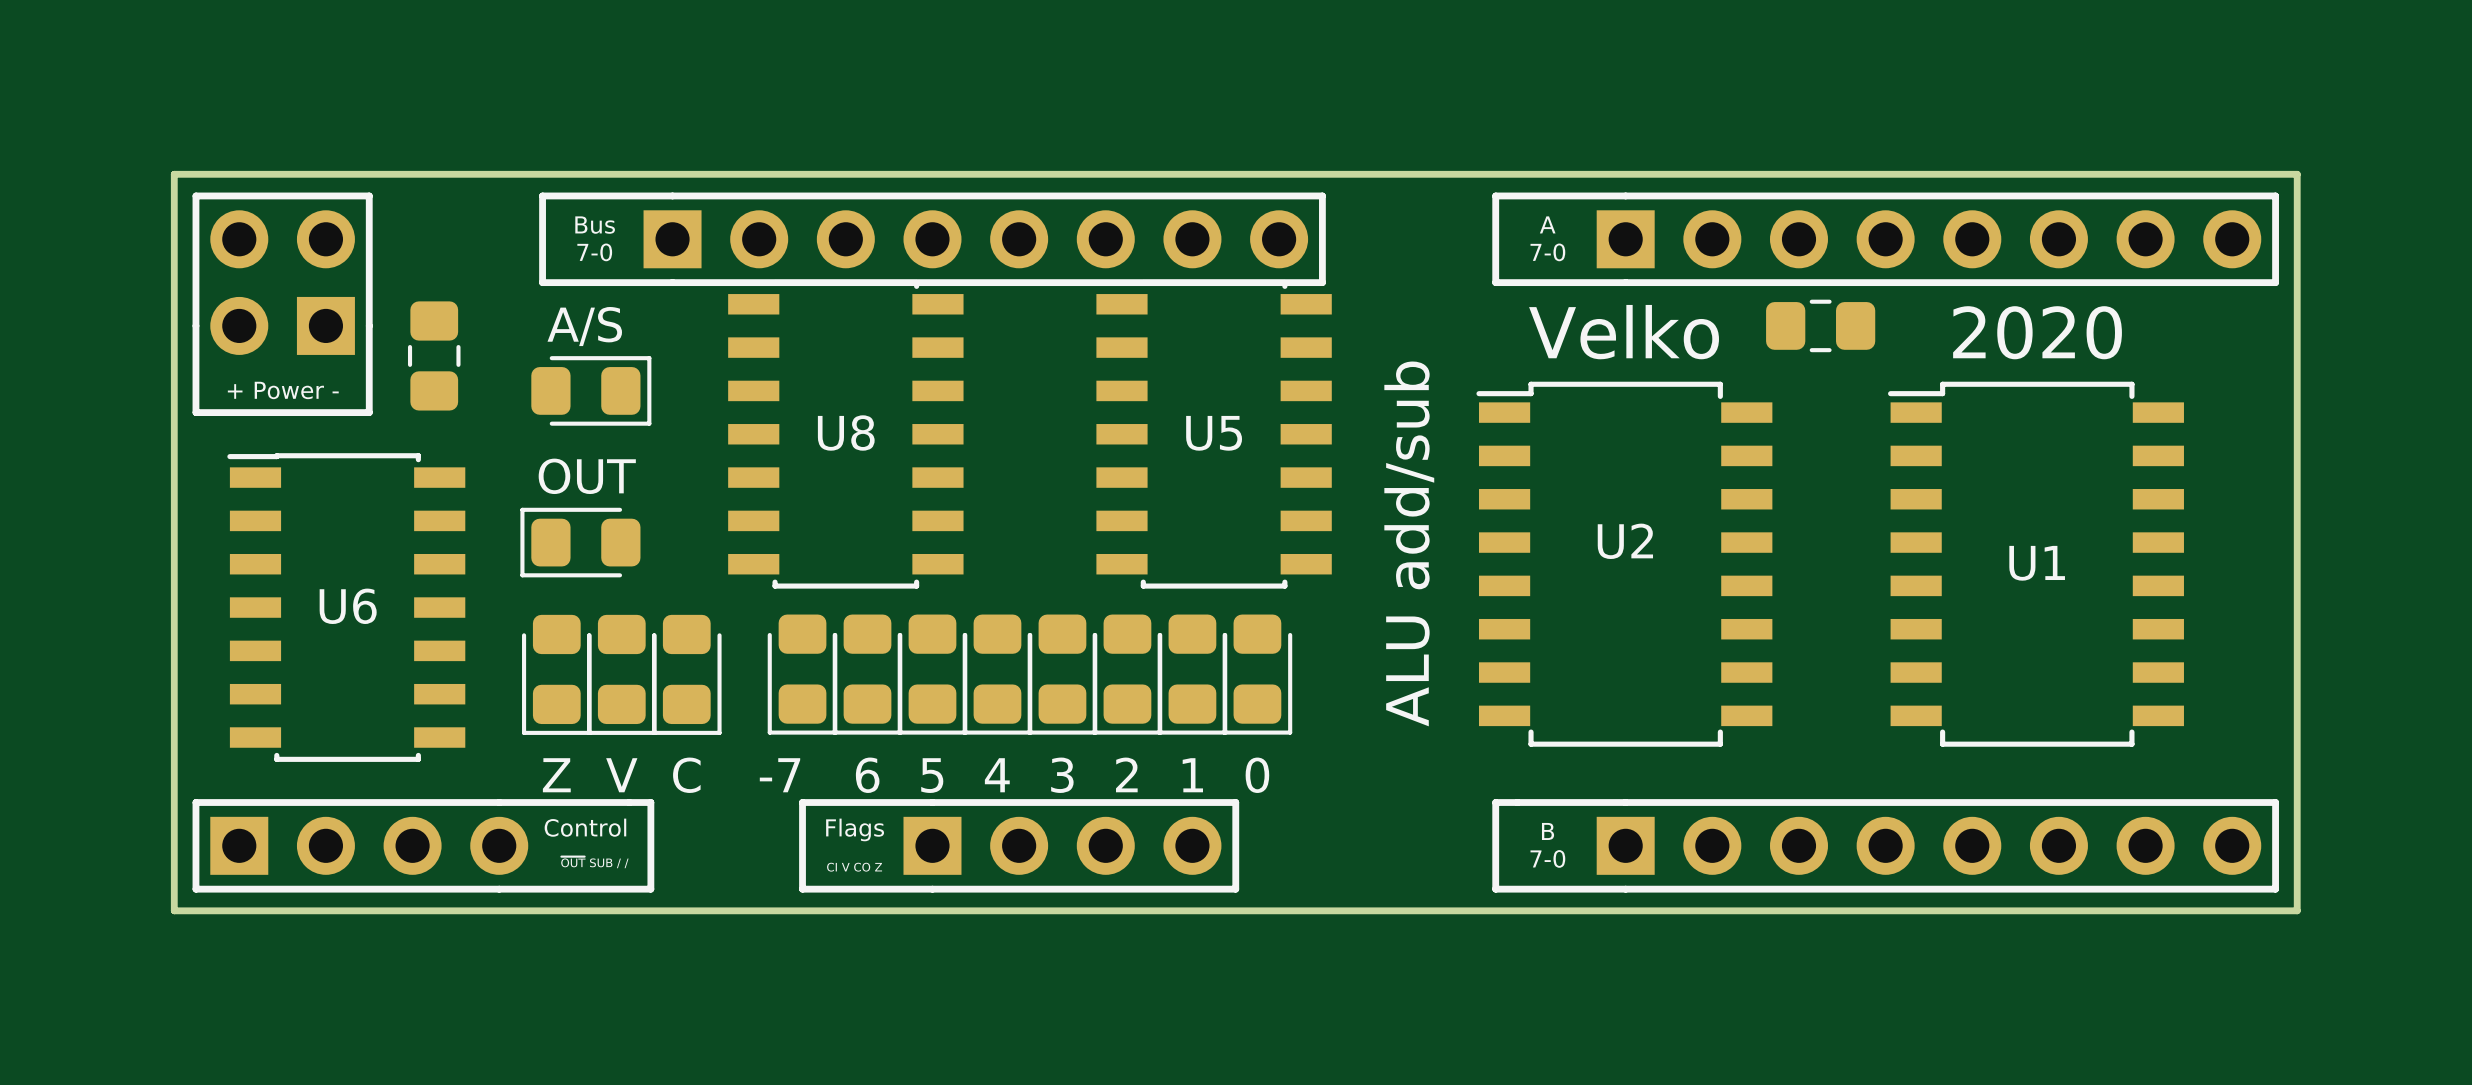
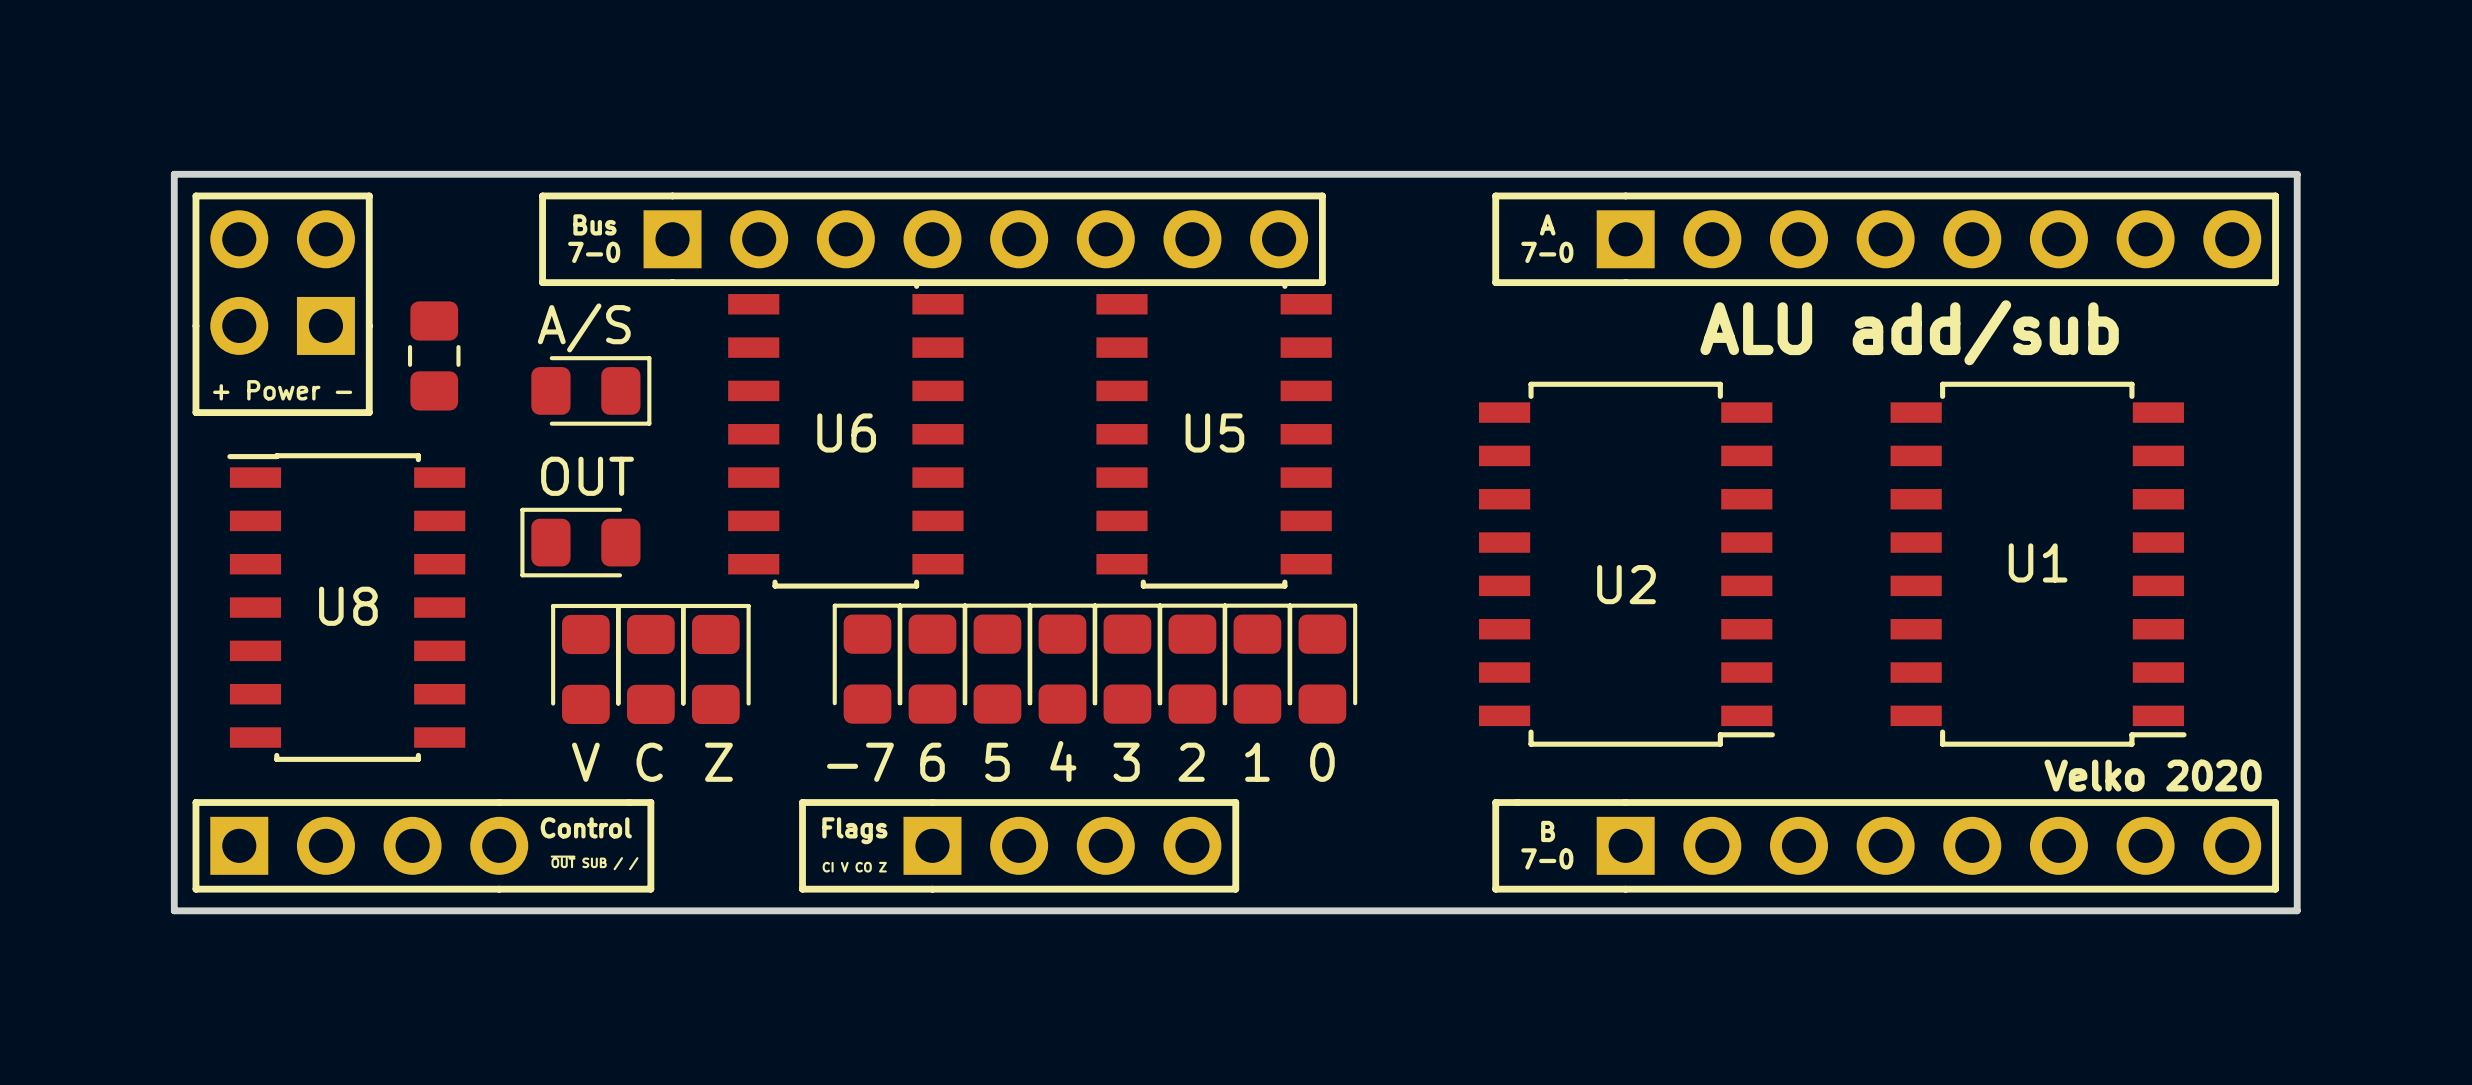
part: (1820, 325) -> none
text: Velko (1624, 332) -> none
text: 2020 (2037, 332) -> none
U8 name: U8 (846, 433) -> U6 (846, 432)
text rotation: 0° (1409, 543) -> 90° clockwise (1909, 332)
text position: ALU add/sub (1409, 543) -> ALU add/sub (1909, 332)
U2 rotation: 0° (1624, 564) -> 180° (1626, 564)
U1 rotation: 0° (2036, 564) -> 180° (2038, 564)
U6 name: U6 (348, 606) -> U8 (348, 606)
part: none -> 0 (1322, 663)
part rotation: 0° (556, 674) -> 180° (715, 663)
part position: (556, 674) -> (715, 663)
part rotation: 0° (621, 674) -> 180° (585, 663)
part rotation: 0° (686, 674) -> 180° (650, 663)
part: -7 (802, 674) -> none
part rotation: 0° (867, 674) -> 180° (867, 663)
part rotation: 0° (932, 674) -> 180° (932, 663)
part rotation: 0° (997, 674) -> 180° (997, 663)
part rotation: 0° (1062, 674) -> 180° (1062, 663)
part rotation: 0° (1127, 674) -> 180° (1127, 663)
part rotation: 0° (1192, 674) -> 180° (1192, 663)
part rotation: 0° (1257, 674) -> 180° (1257, 663)
part value: 2 (1126, 774) -> 3 (1126, 762)
part value: 6 (867, 775) -> -7 (860, 762)
part value: 5 (932, 775) -> 6 (932, 762)
part value: 4 (997, 775) -> 5 (997, 762)
part value: 3 (1062, 775) -> 4 (1063, 761)
part value: 1 (1192, 775) -> 2 (1191, 762)
part value: 0 (1257, 775) -> 1 (1257, 762)
text: none -> Velko 2020 (2153, 775)

